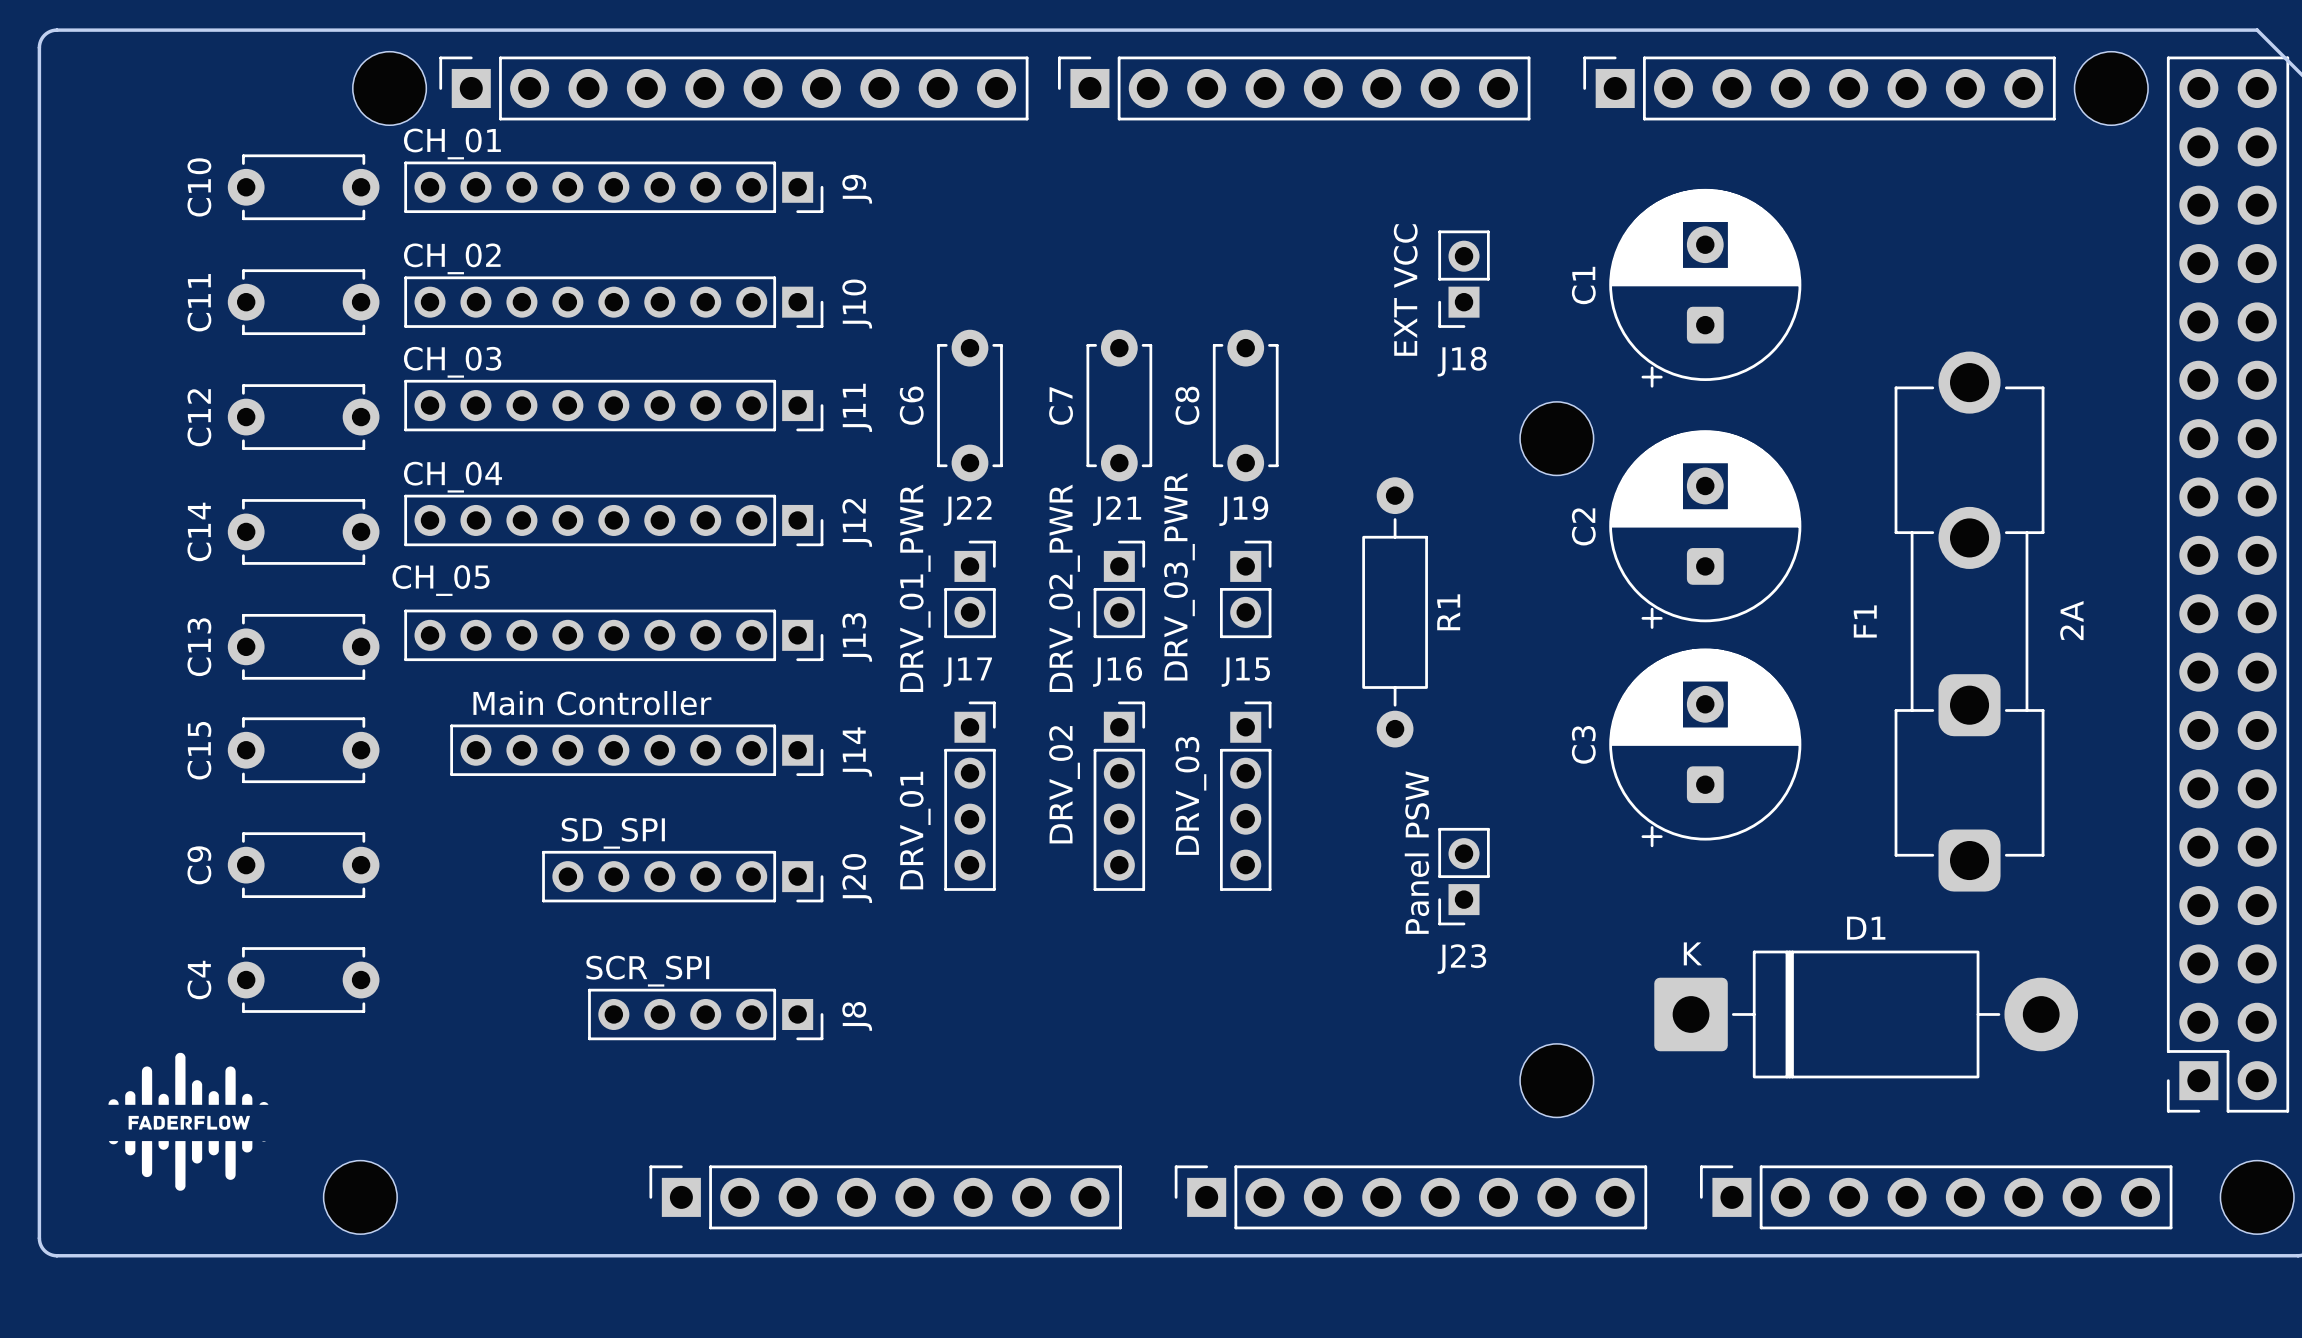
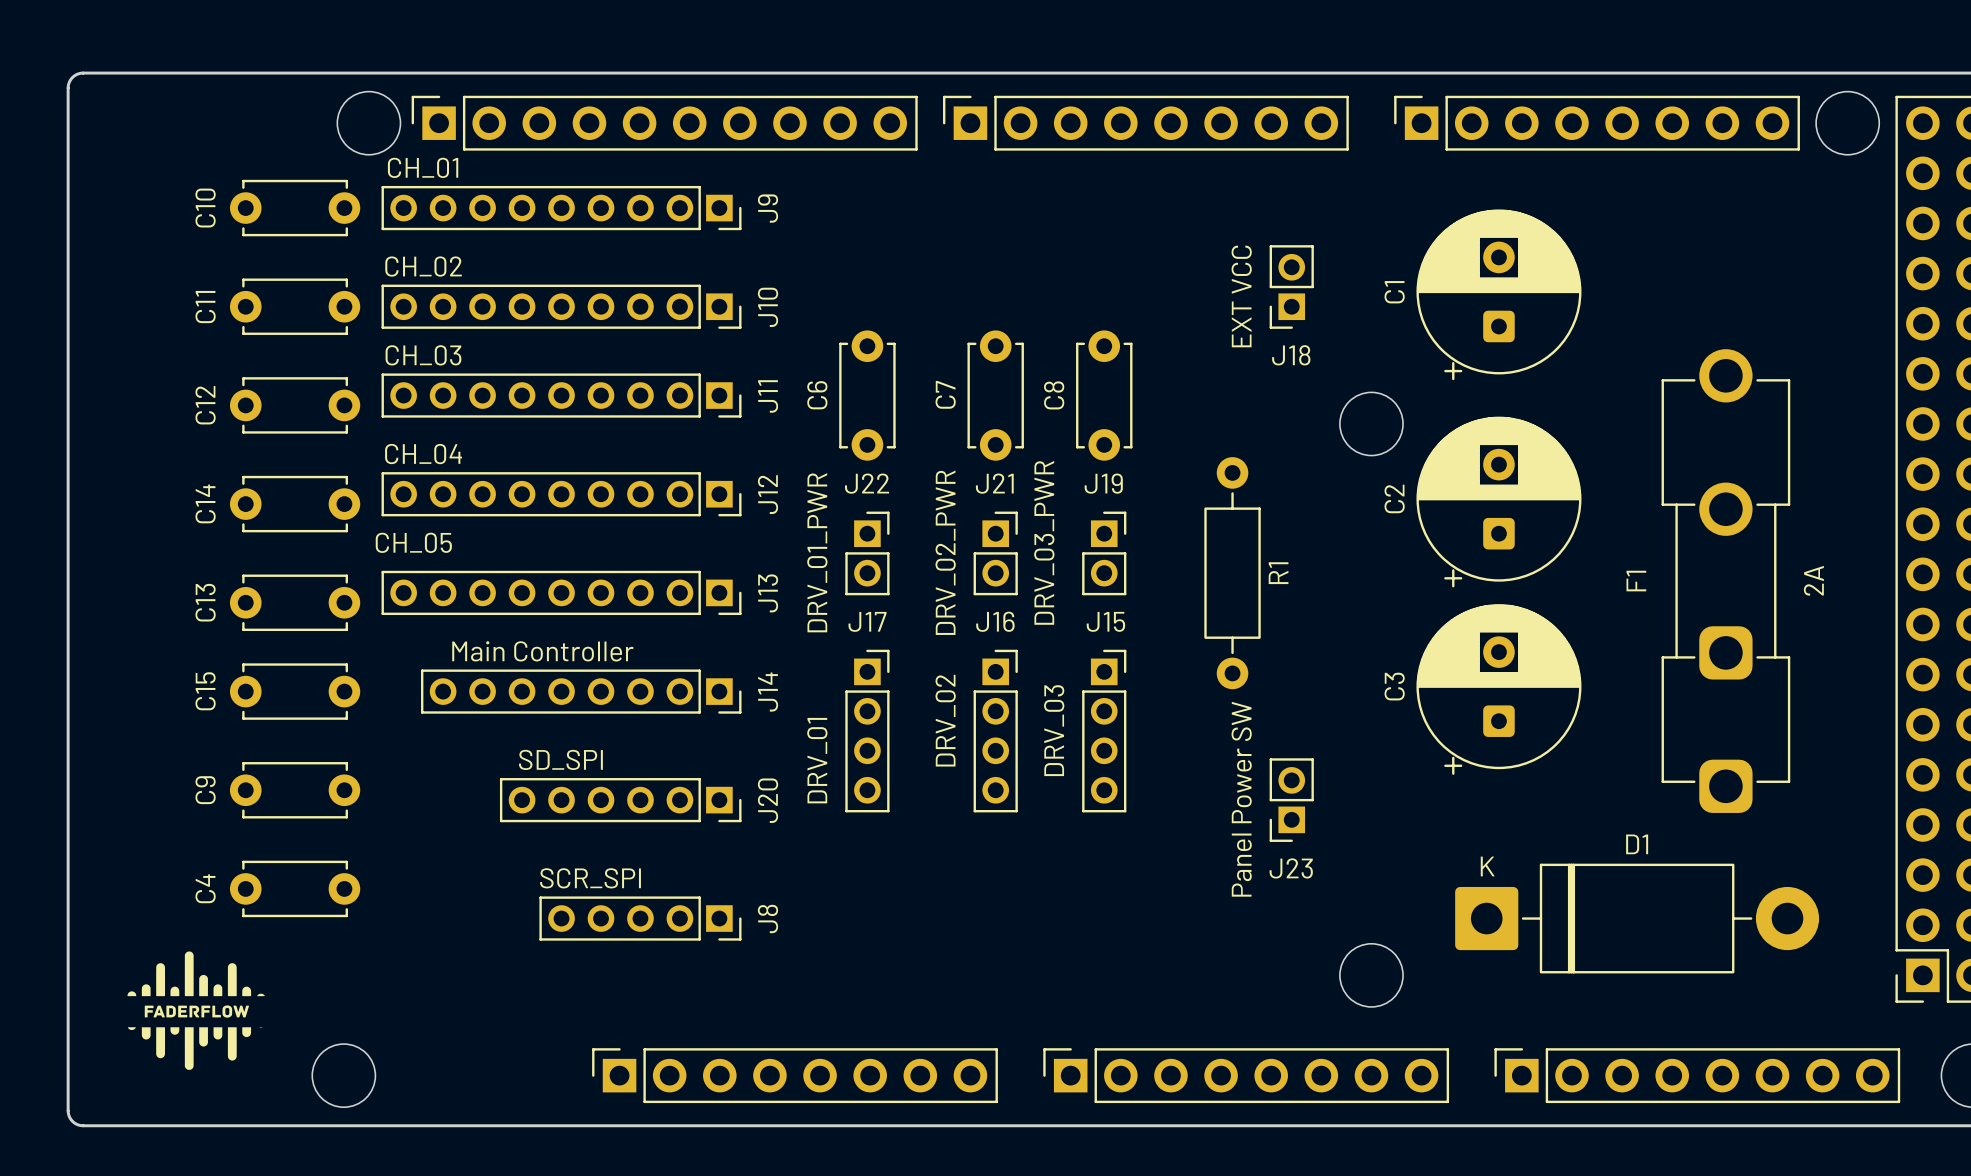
J23 value: Panel PSW (1416, 852) -> Panel Power SW (1241, 799)

